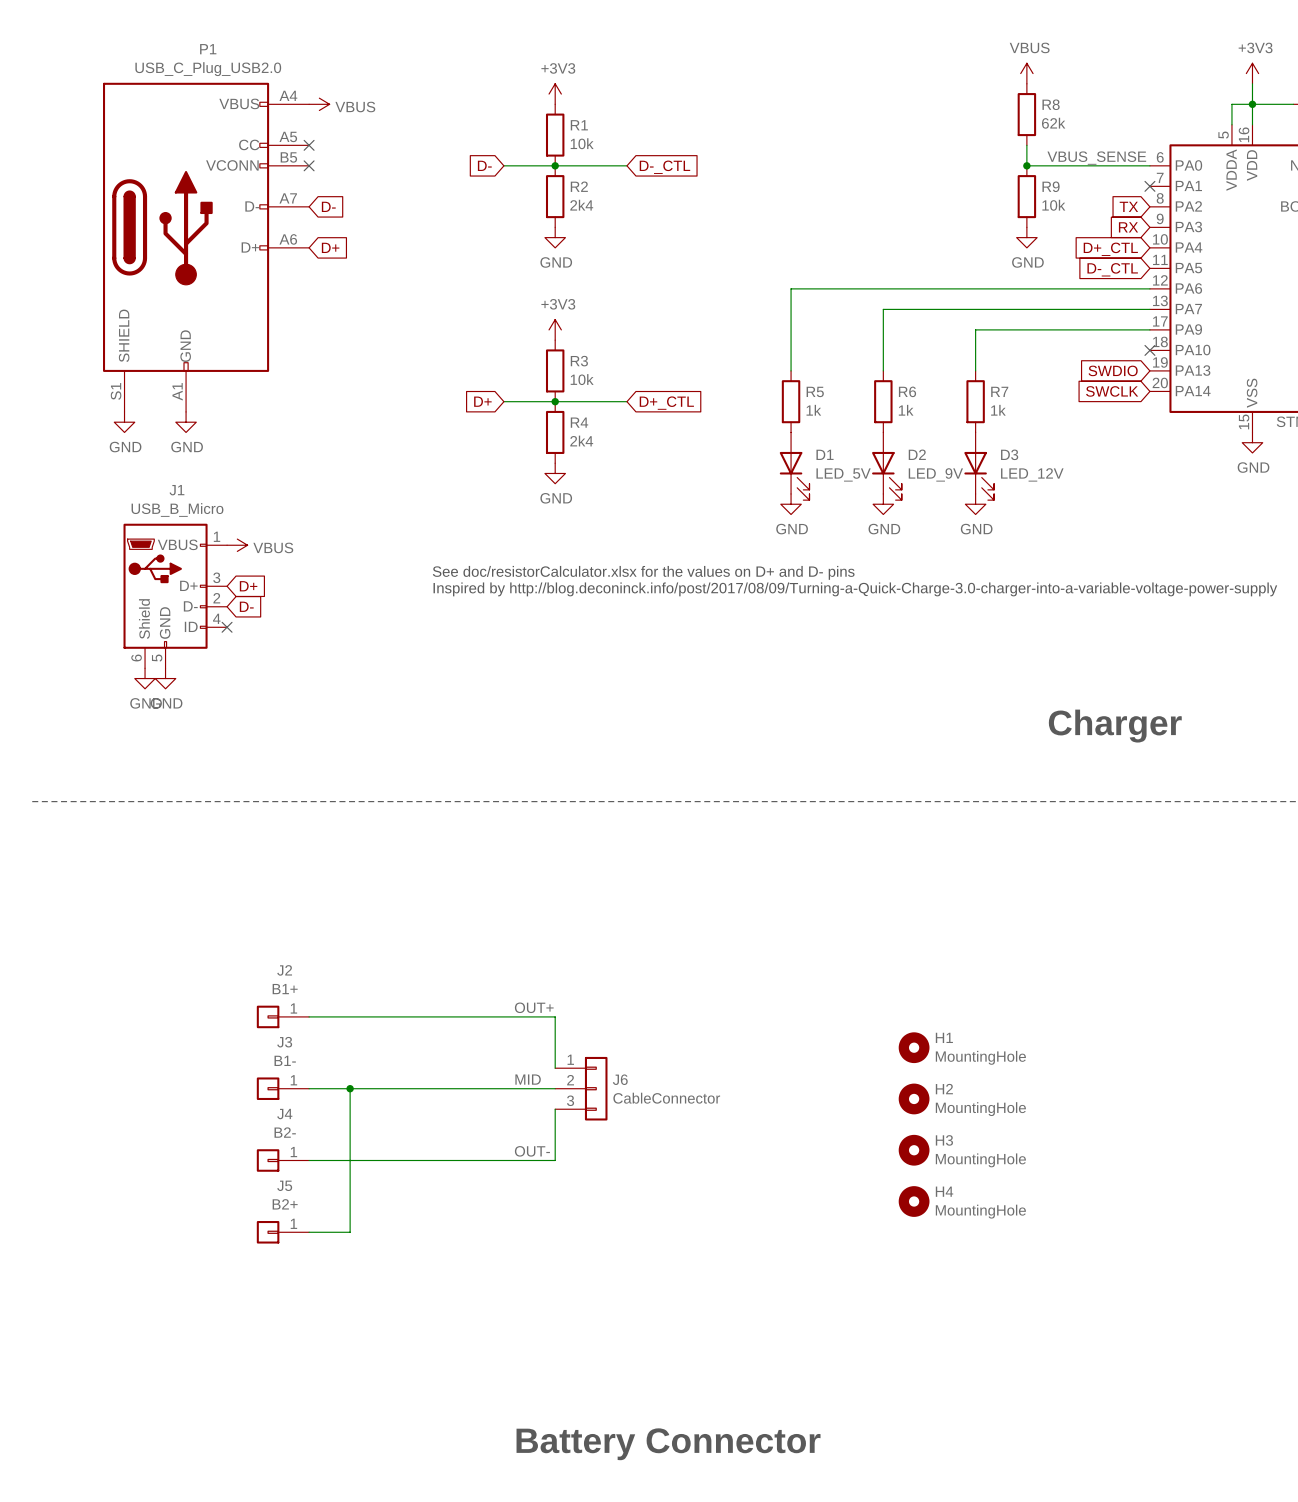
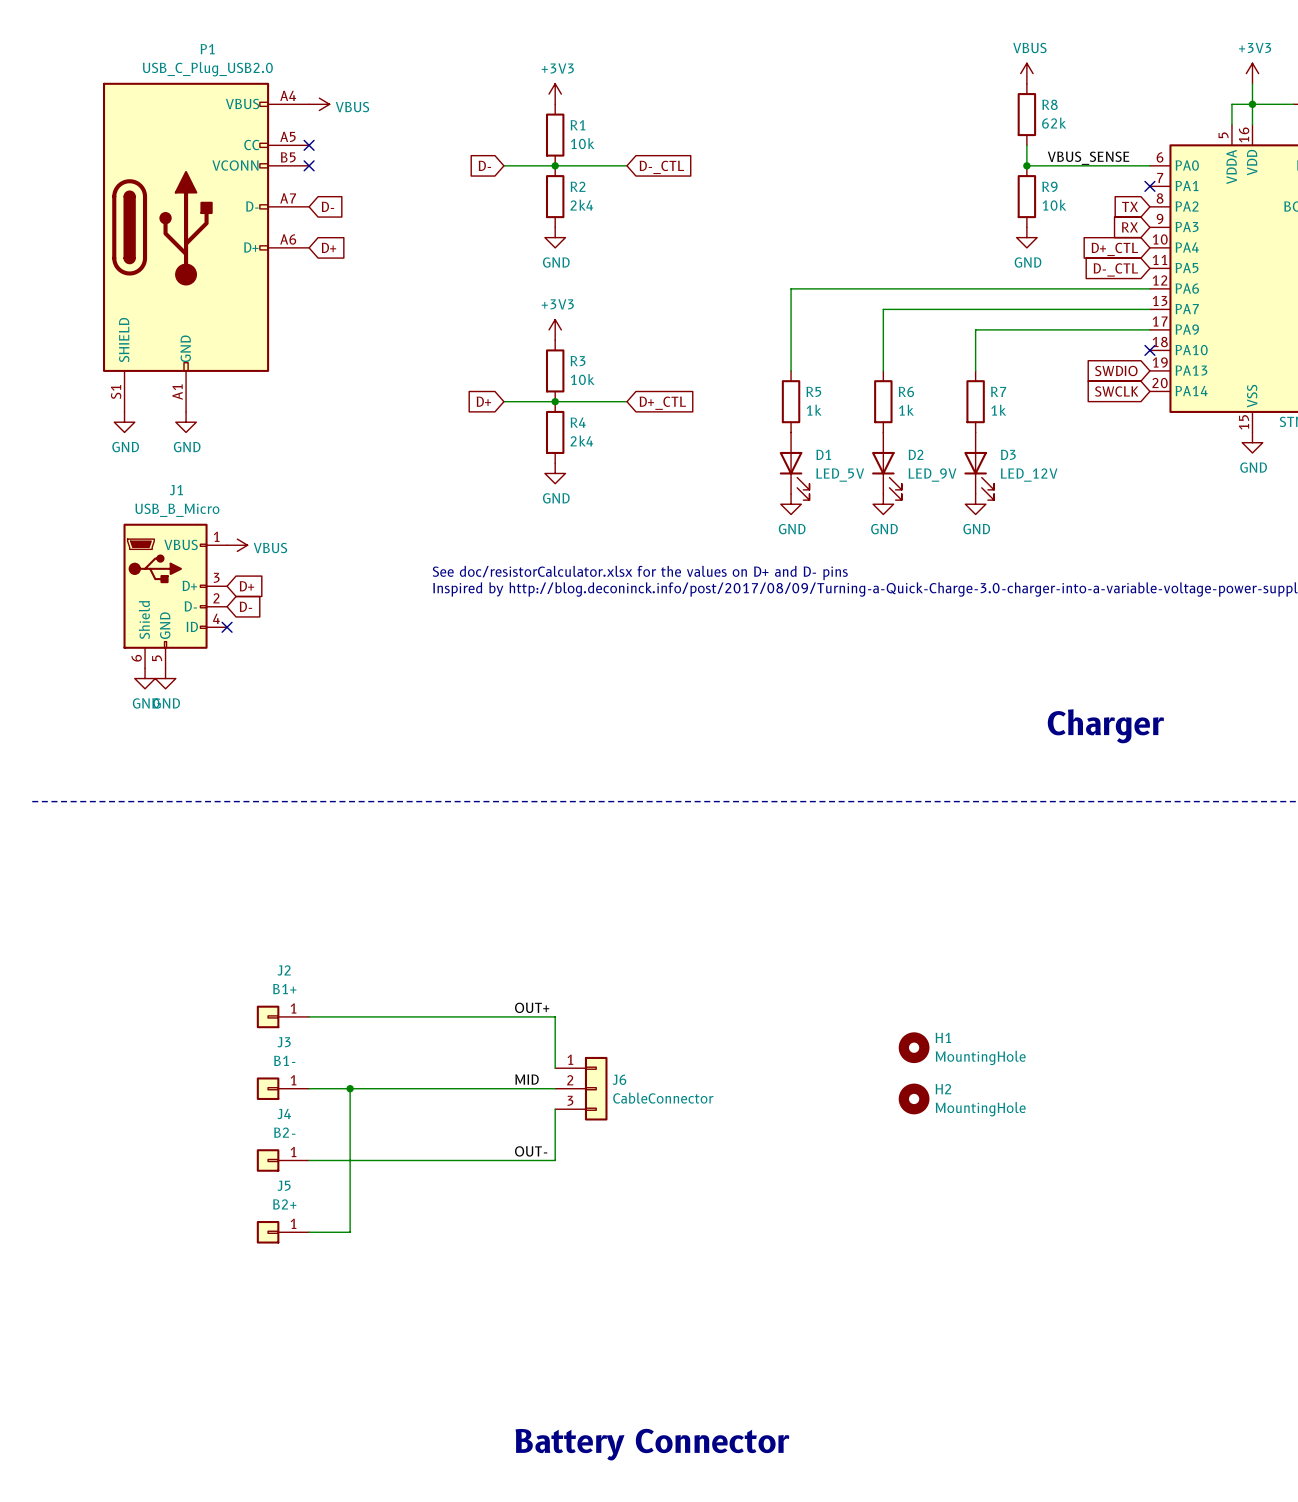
H3: MountingHole (914, 1150) -> none
H4: MountingHole (914, 1201) -> none

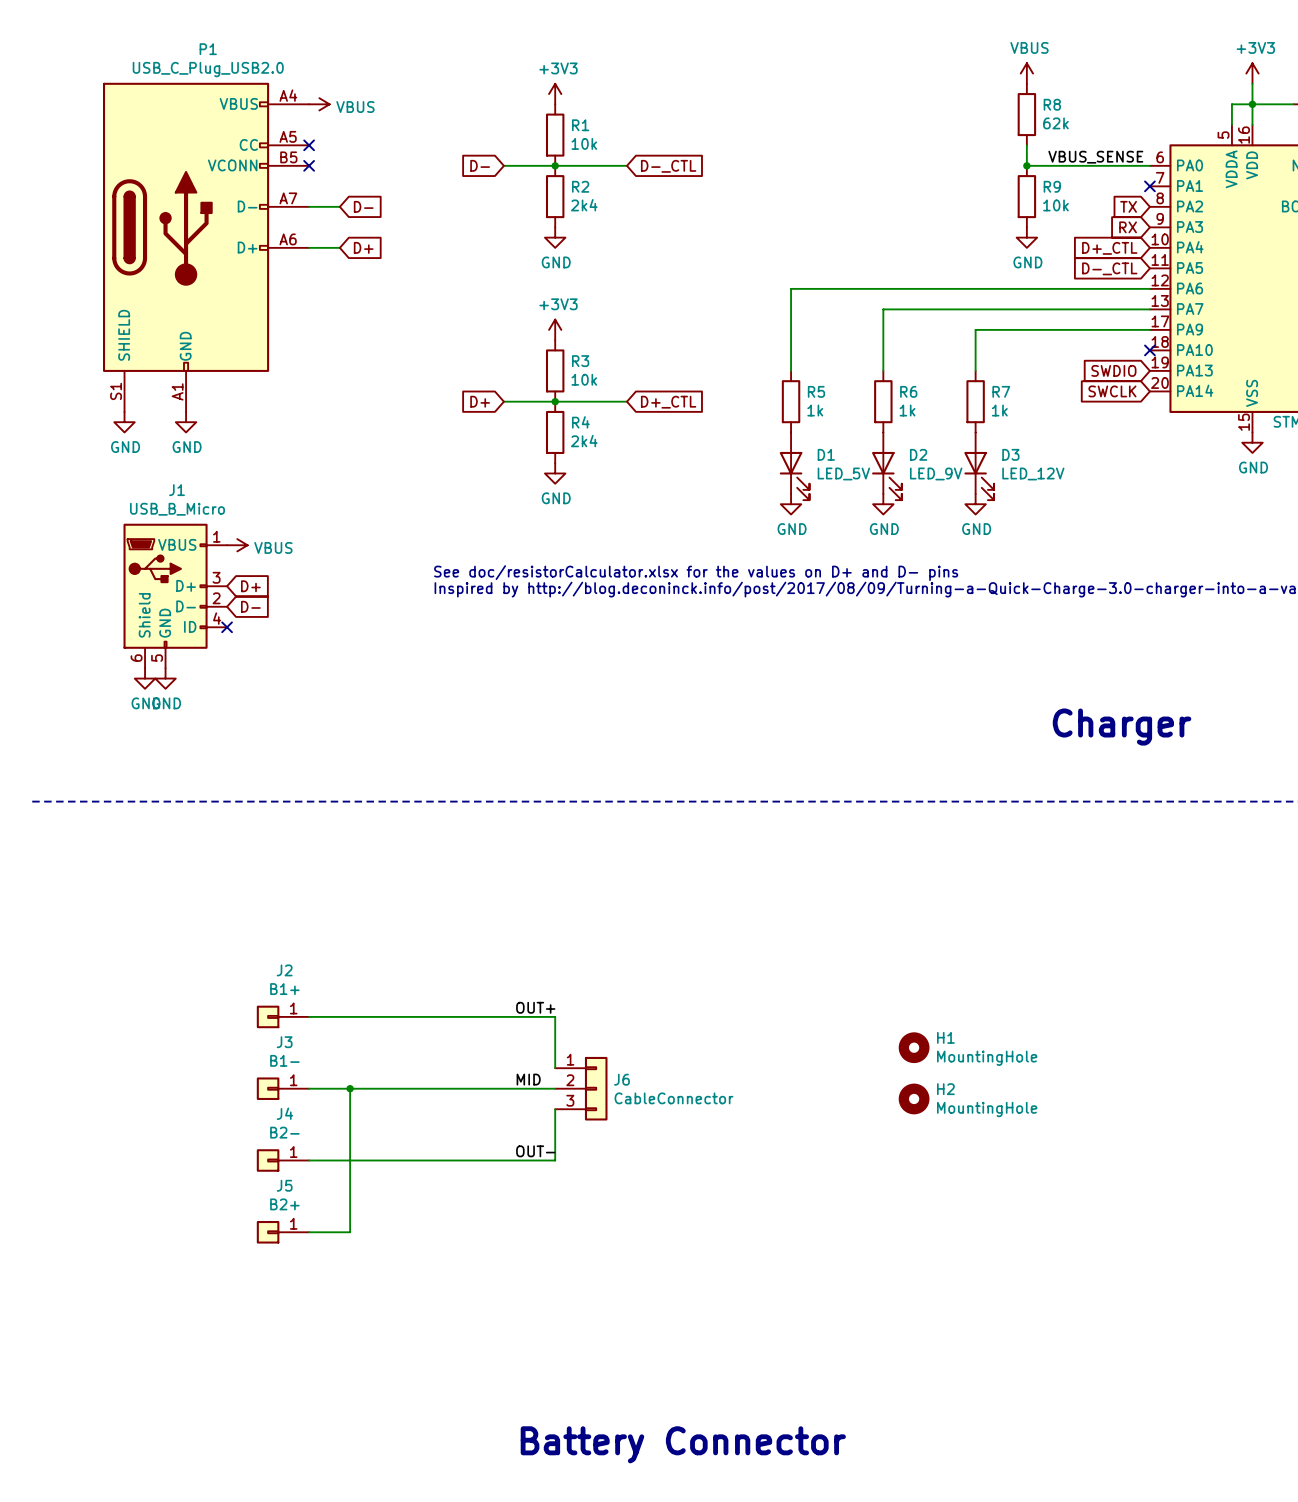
wire: none -> (309, 206) (339, 206)
global label position: D- (327, 206) -> D- (363, 206)
wire: none -> (309, 247) (339, 247)
global label position: D+ (328, 247) -> D+ (363, 247)

